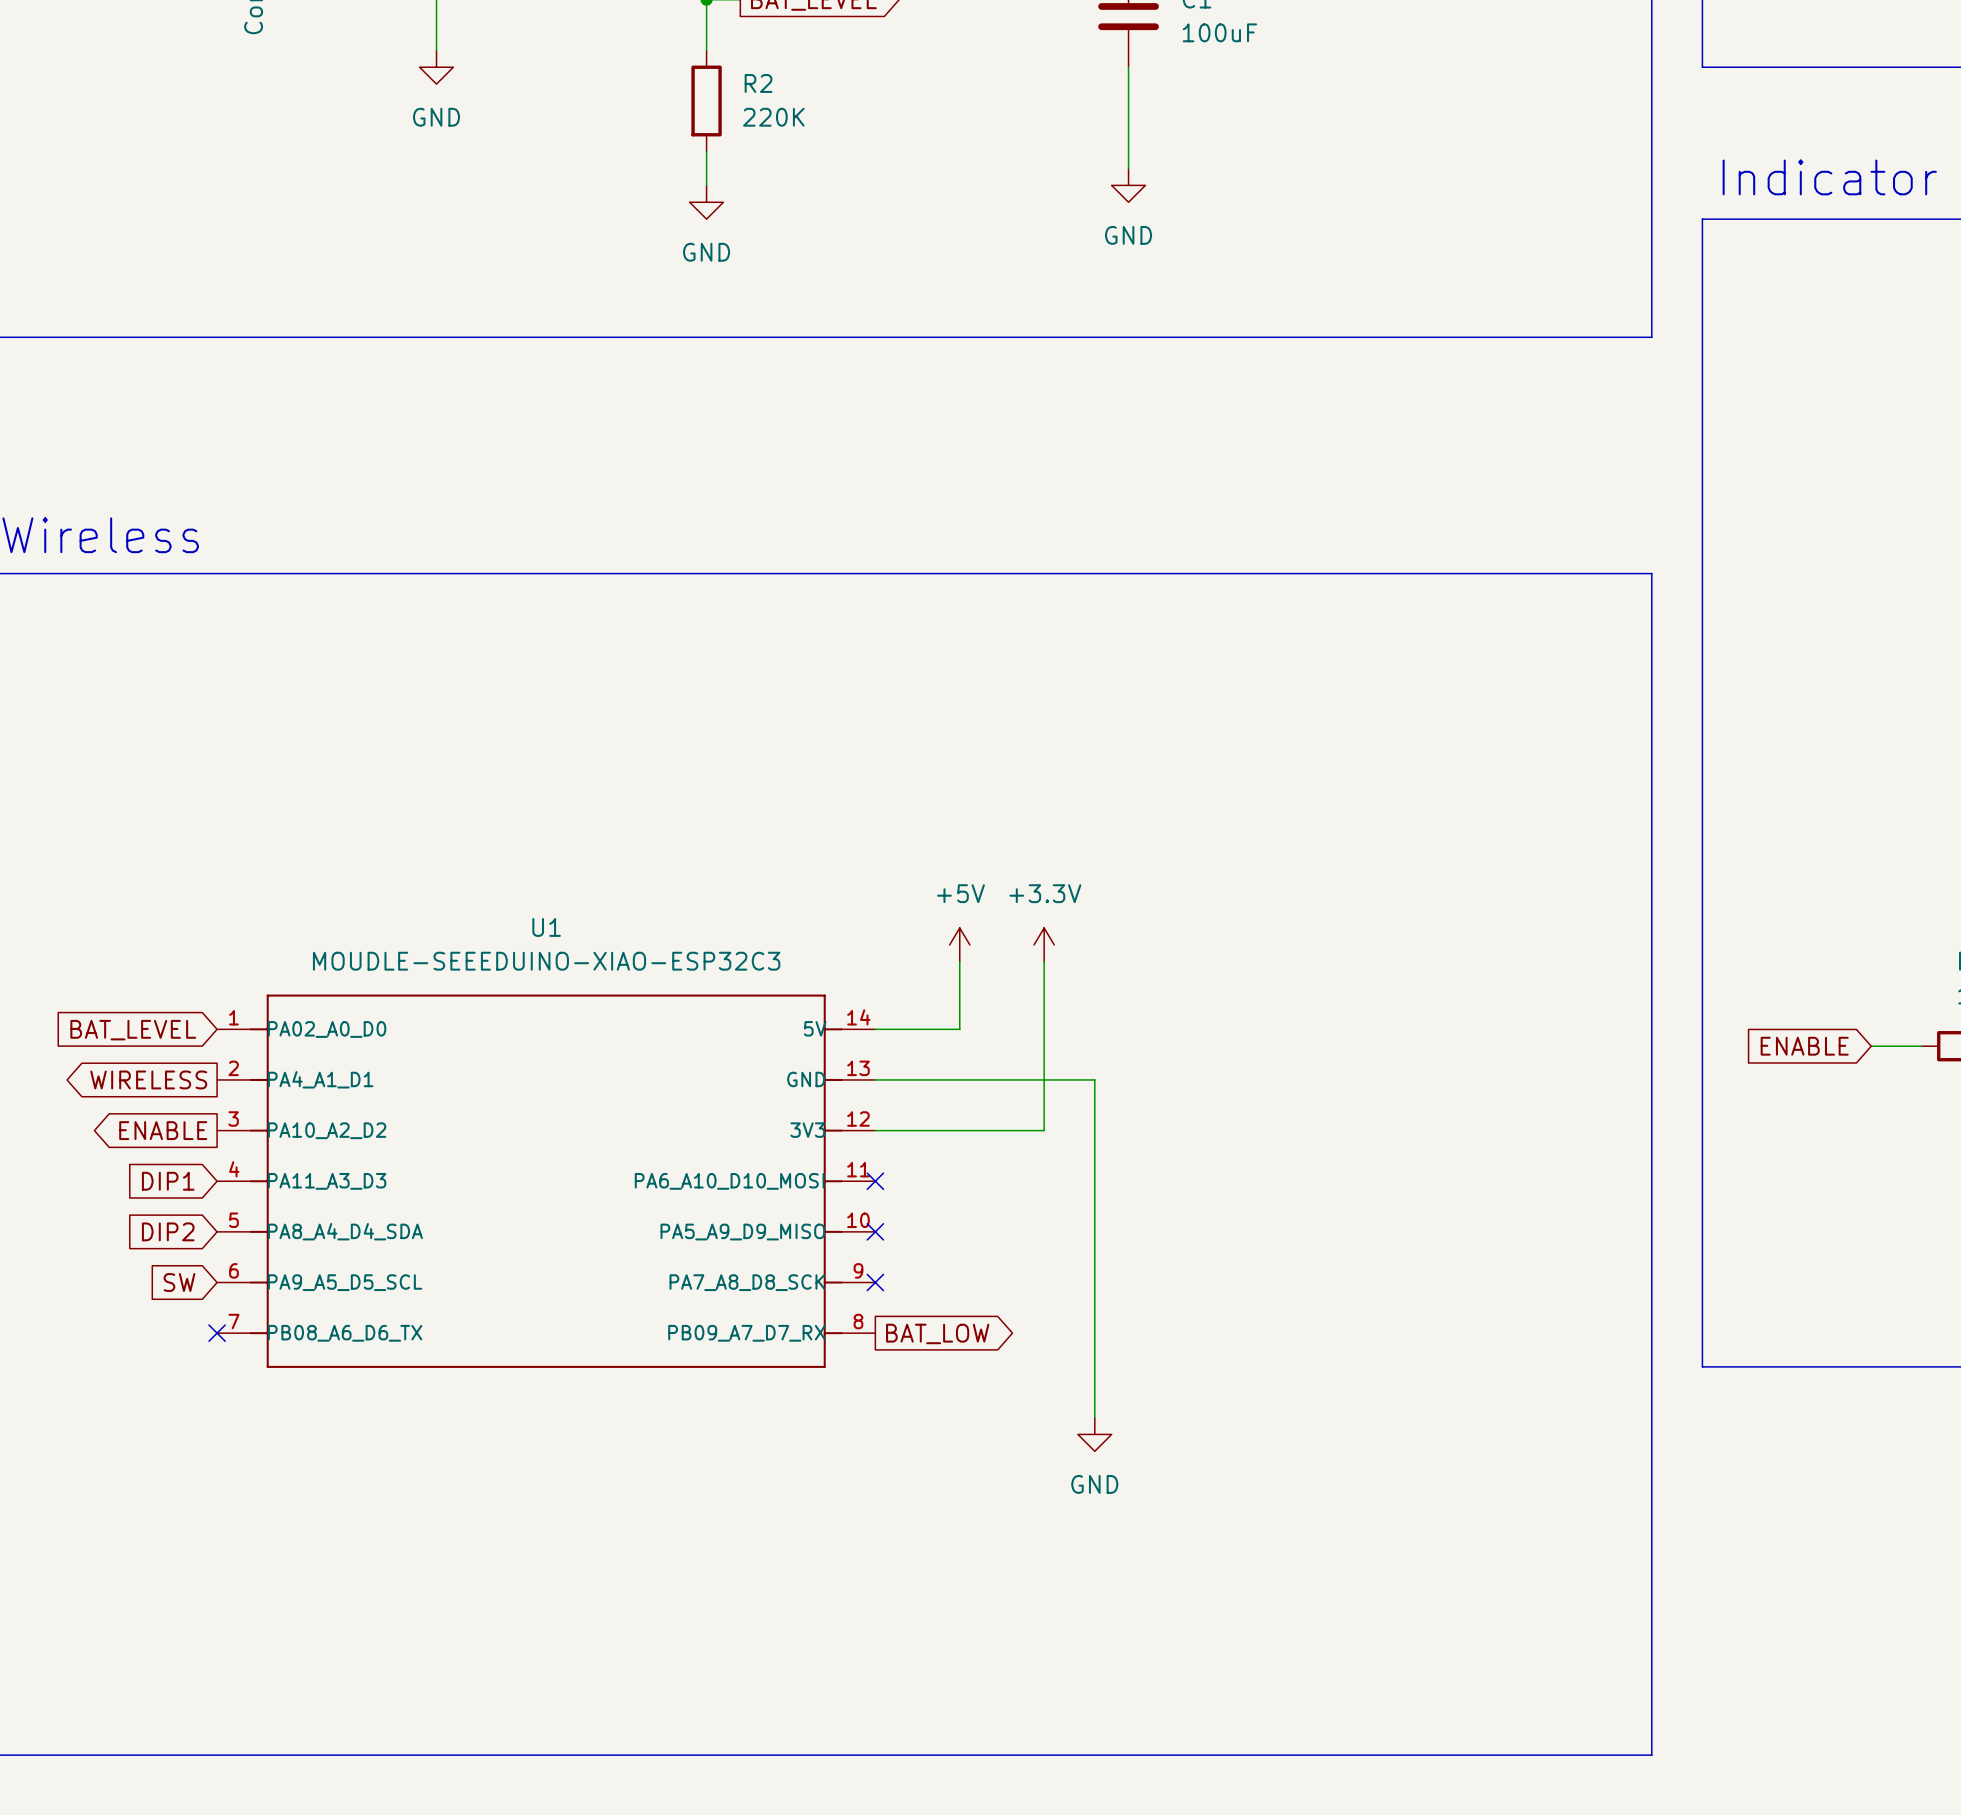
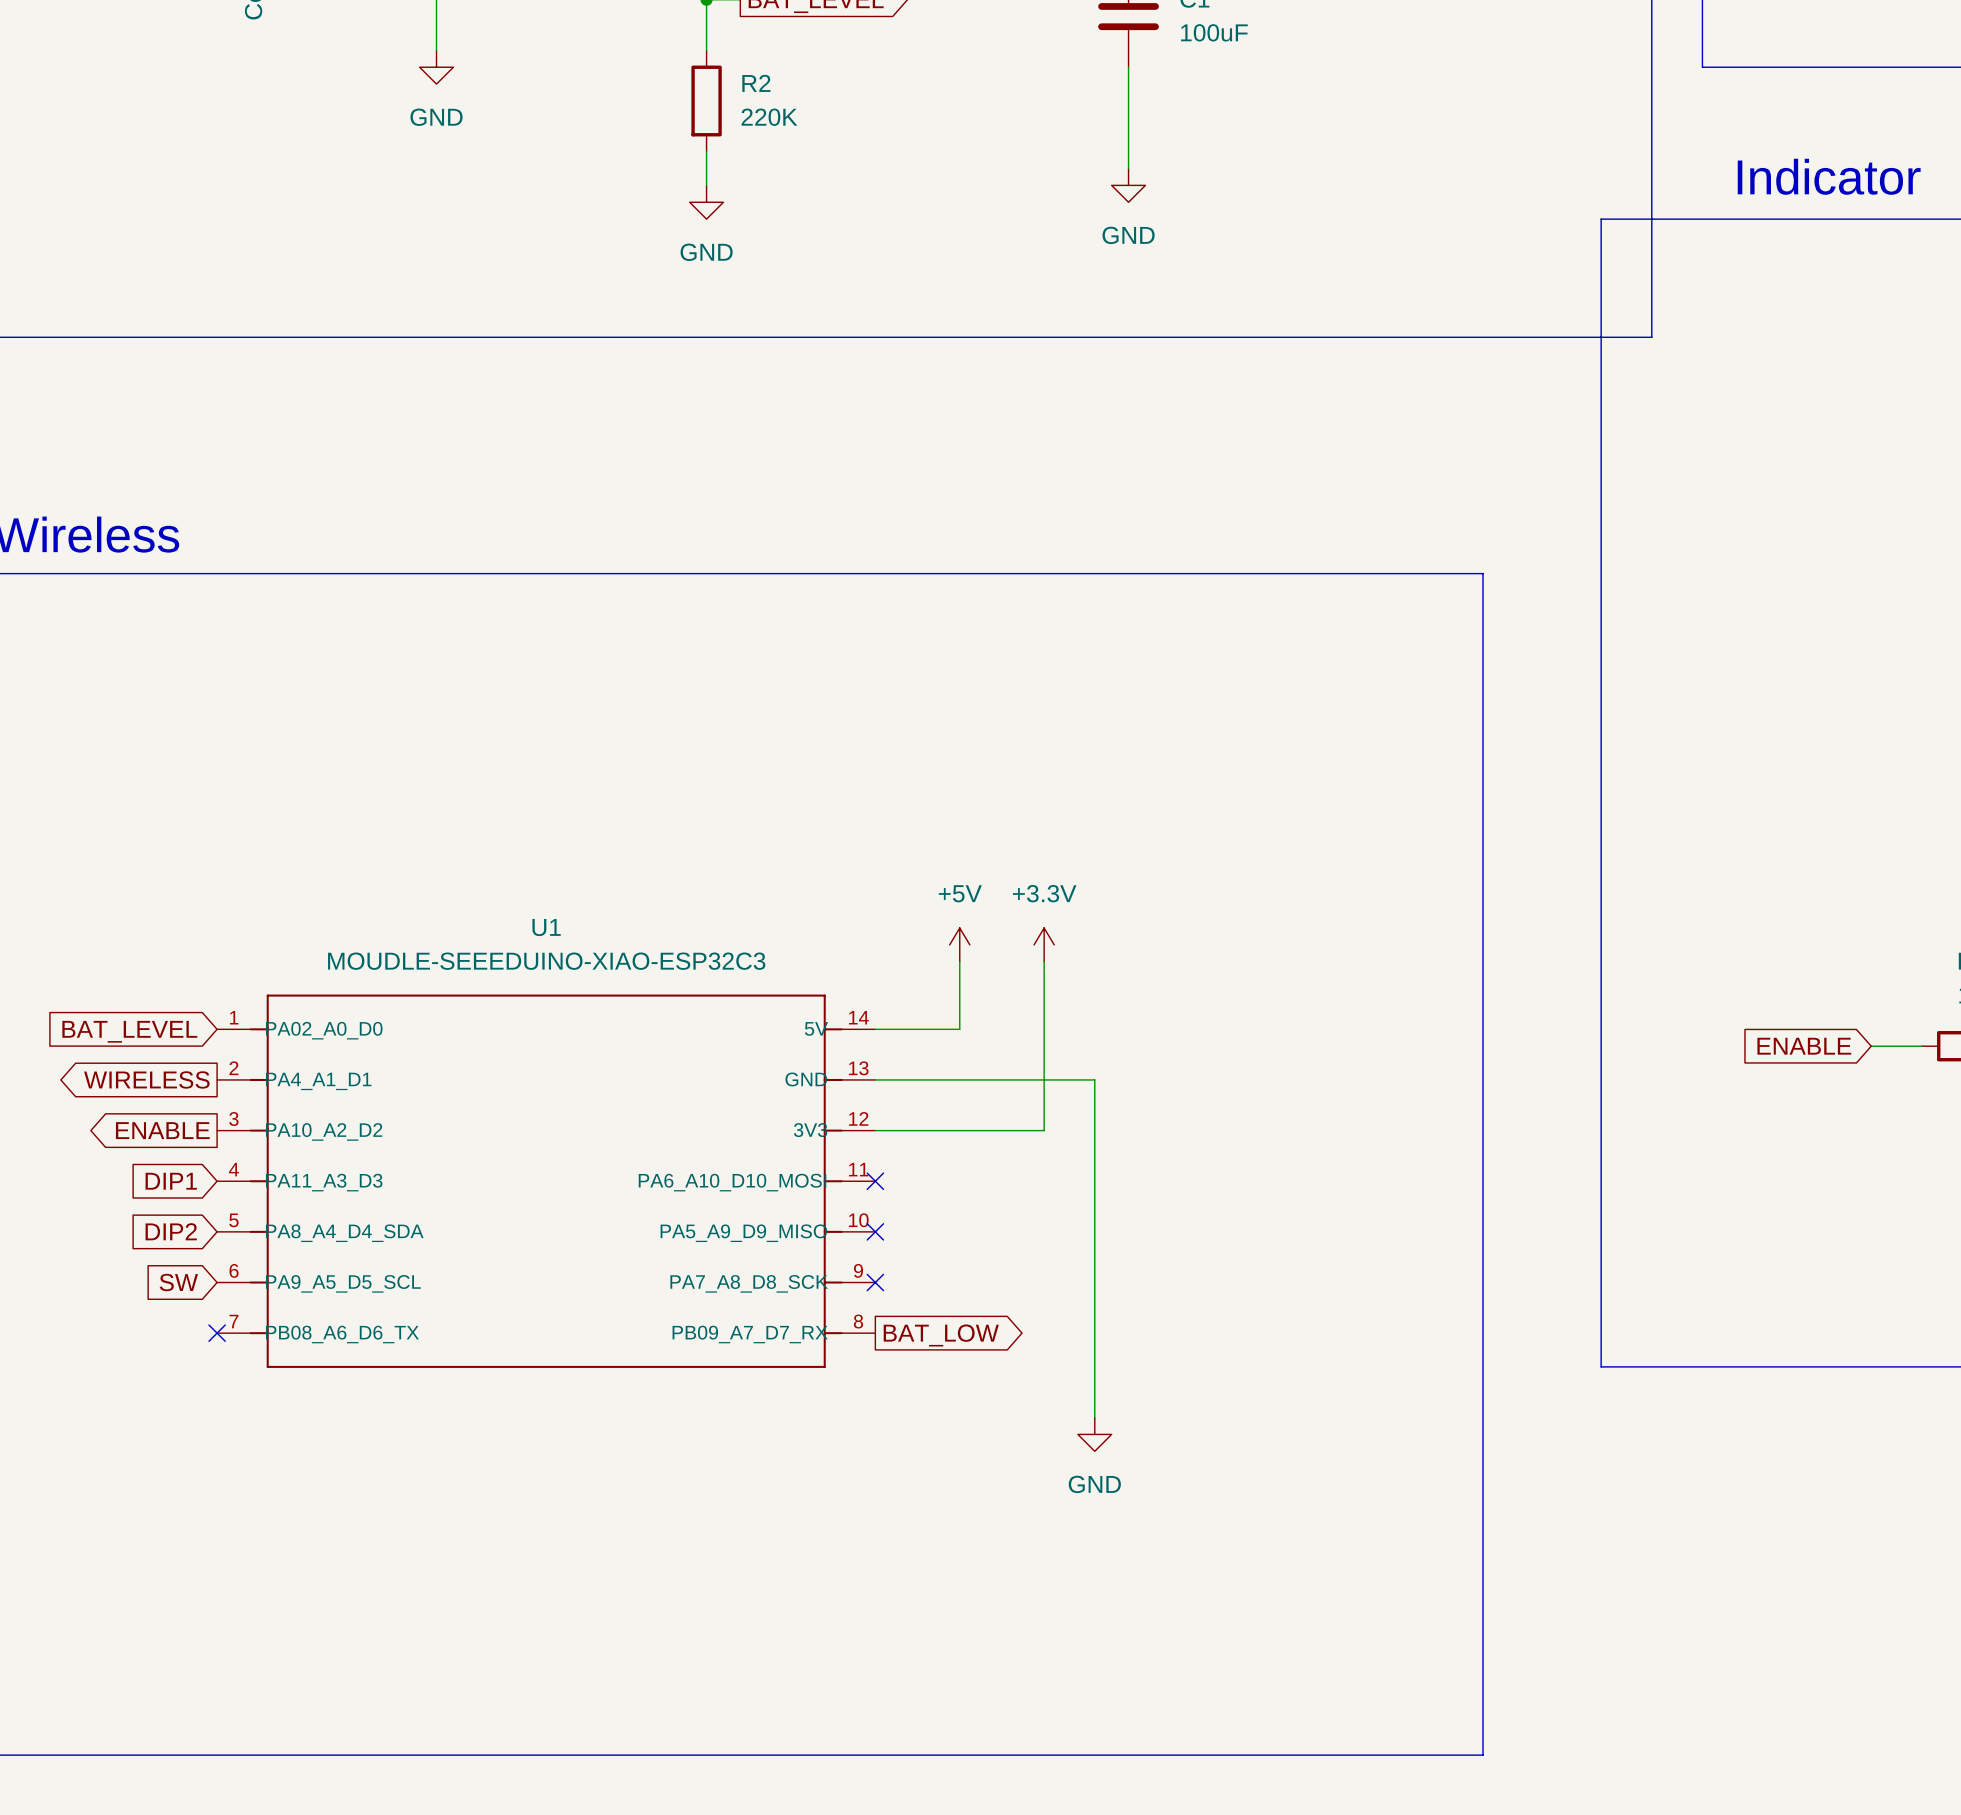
line: (1702, 219) (1702, 1366) -> (1702, 219) (1601, 219) (1601, 1366) (1702, 1366)
line: (1483, 573) (1651, 573) (1651, 1755) (1483, 1755) -> (1483, 573) (1483, 1755)

